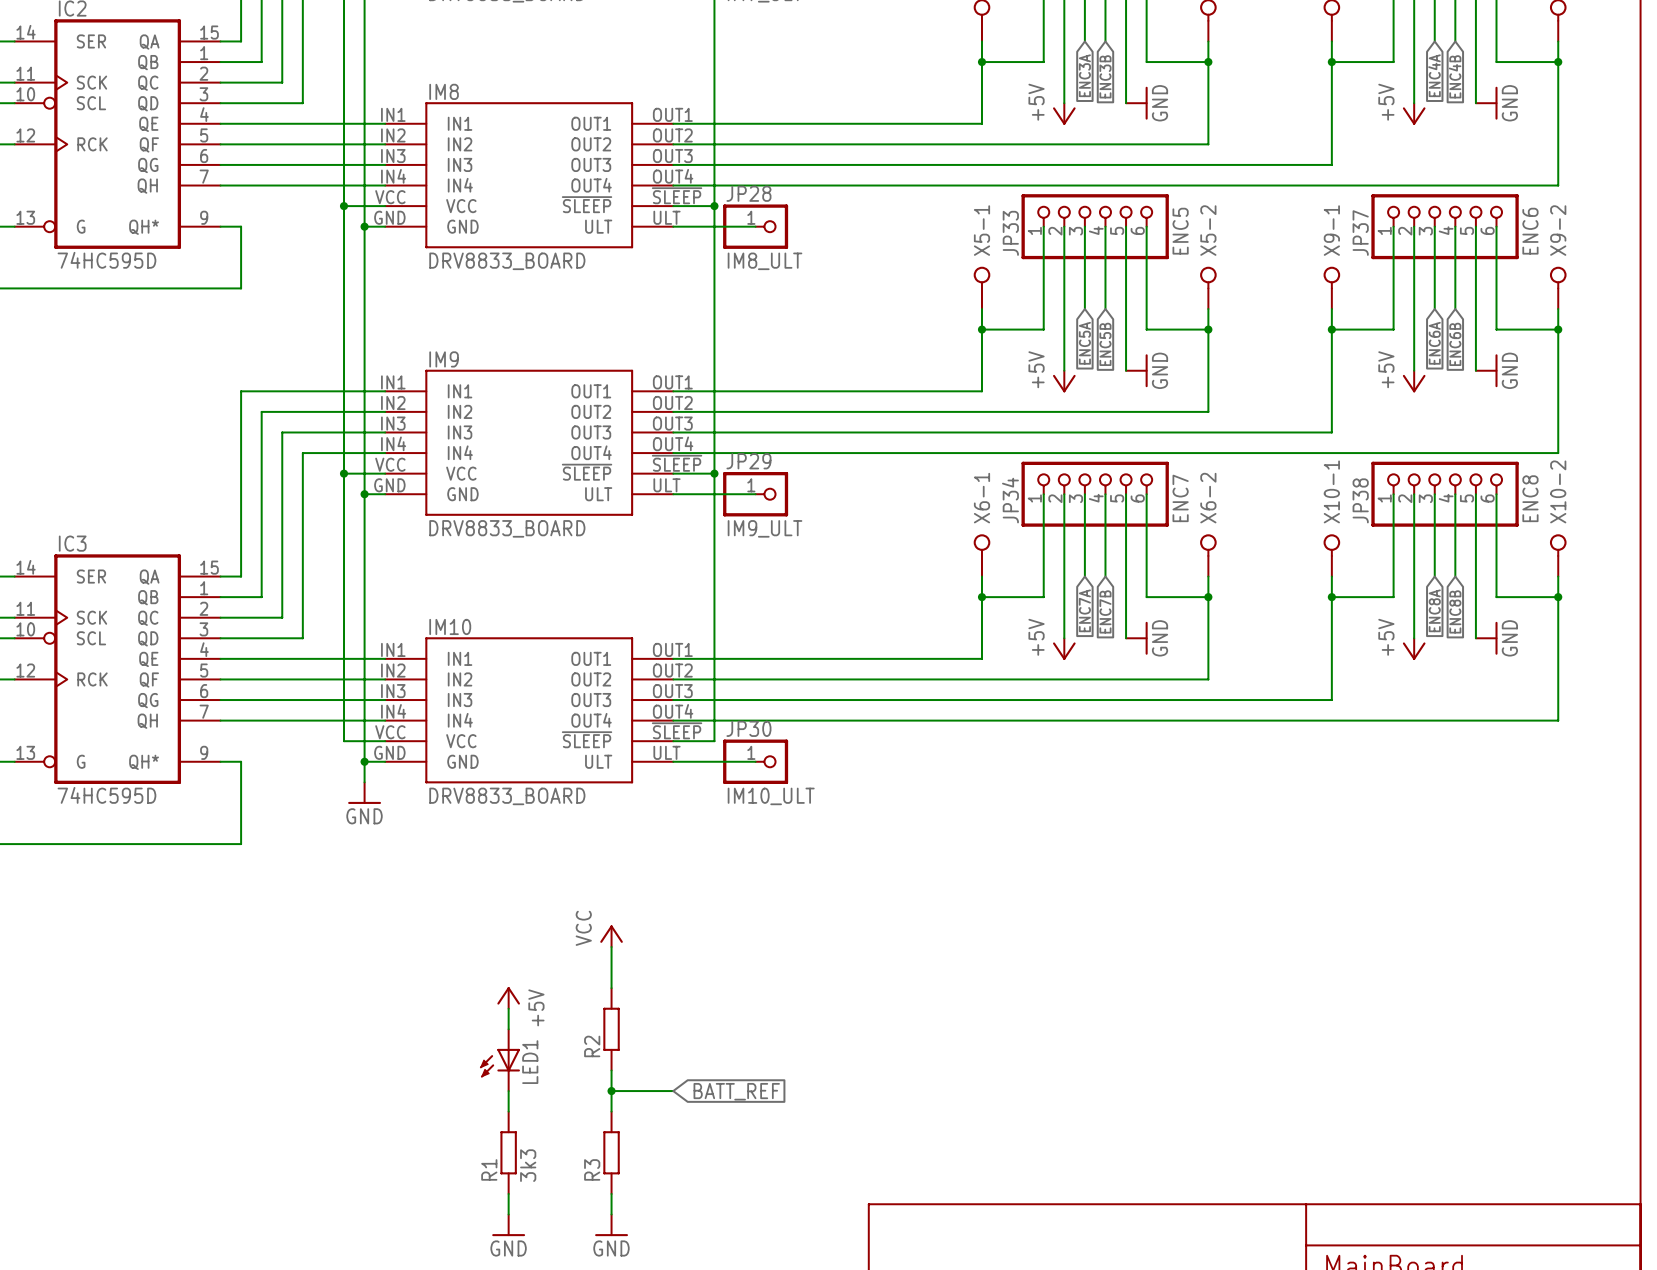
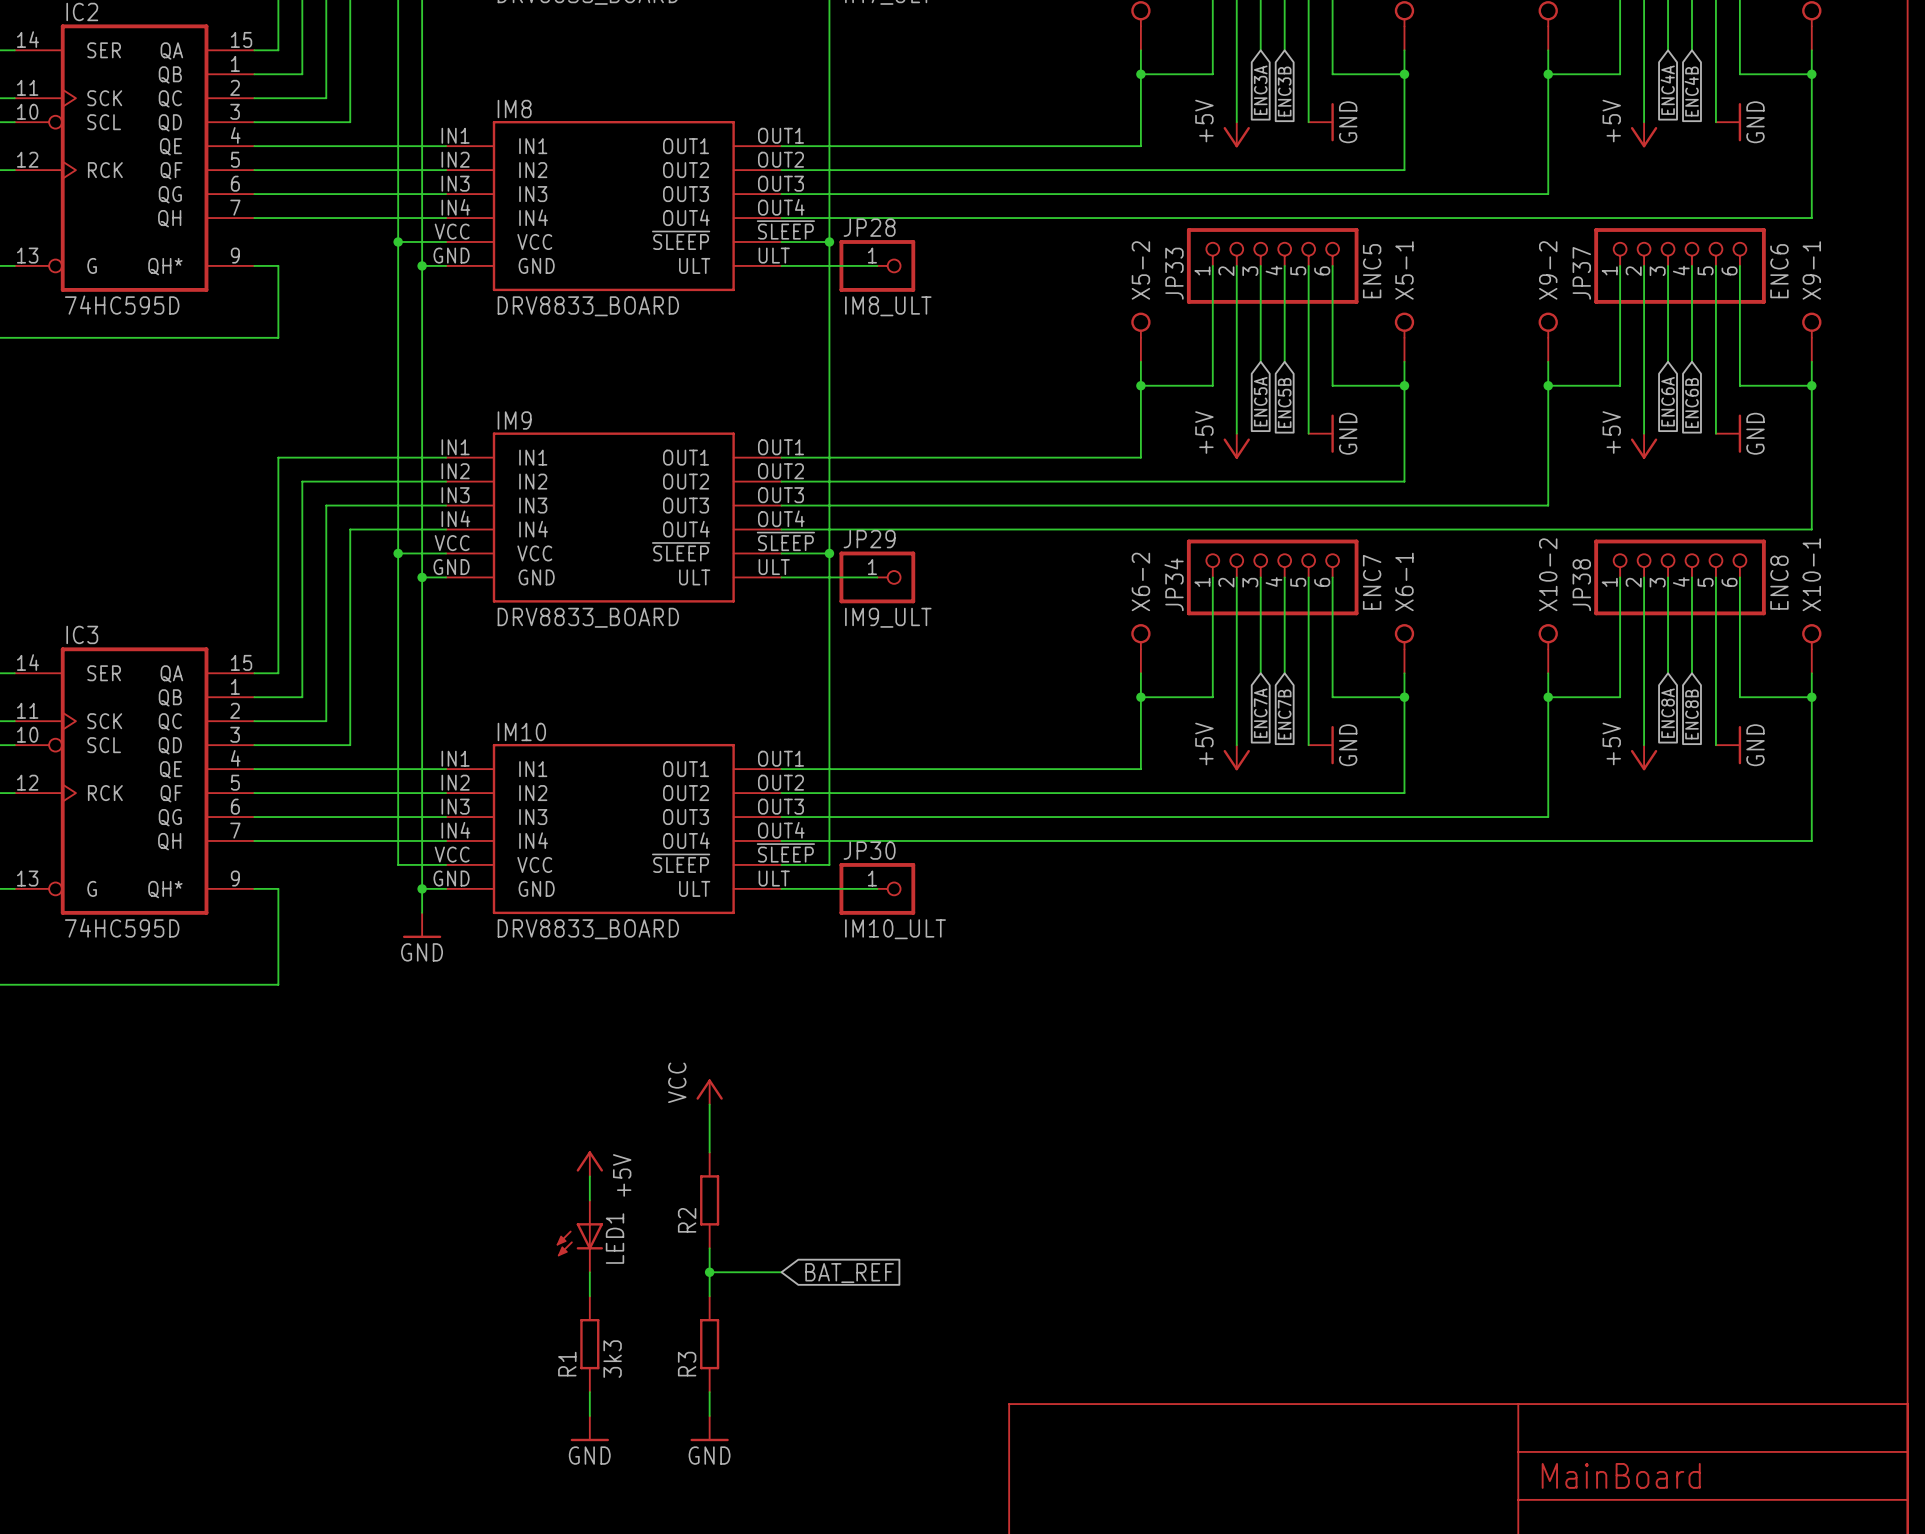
X5-1 name: X5-1 (981, 230) -> X5-2 (1140, 270)
X5-2 name: X5-2 (1208, 230) -> X5-1 (1404, 270)
X9-1 name: X9-1 (1331, 230) -> X9-2 (1548, 270)
X9-2 name: X9-2 (1558, 230) -> X9-1 (1811, 270)
X10-1 name: X10-1 (1331, 491) -> X10-2 (1548, 574)
X10-2 name: X10-2 (1558, 491) -> X10-1 (1811, 574)
X6-1 name: X6-1 (981, 498) -> X6-2 (1140, 581)
X6-2 name: X6-2 (1208, 498) -> X6-1 (1404, 581)
global label: BATT_REF (736, 1091) -> BAT_REF (849, 1273)

